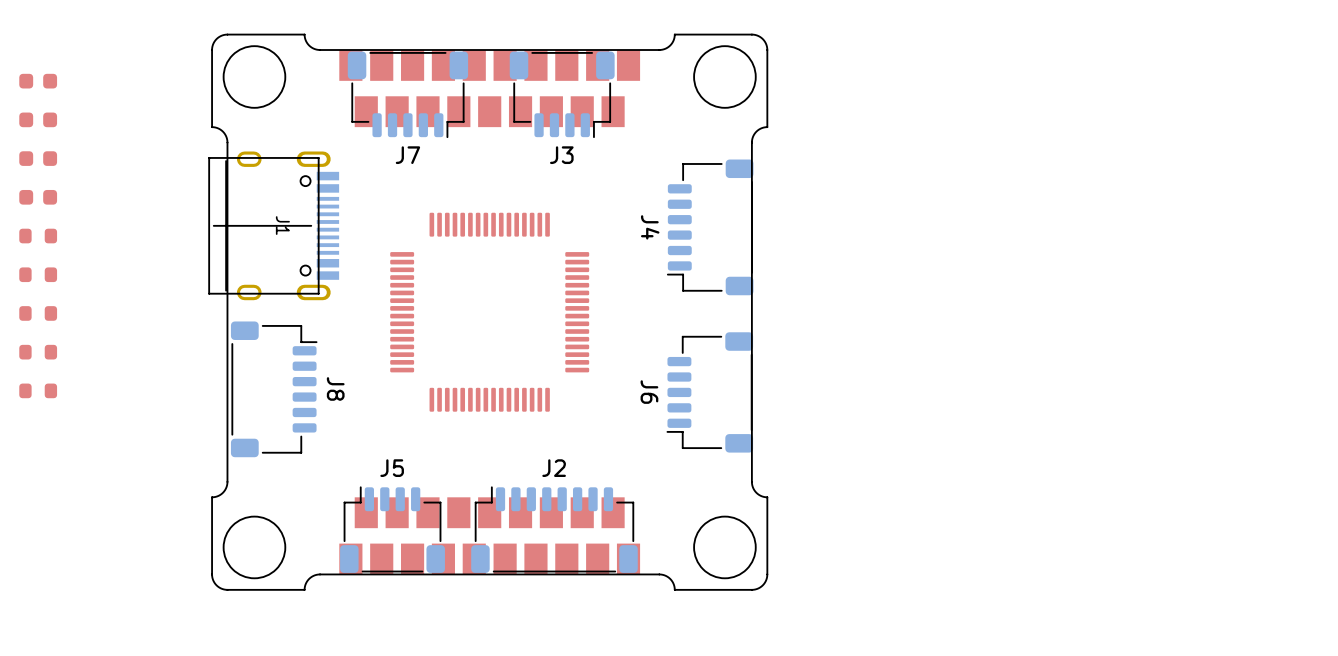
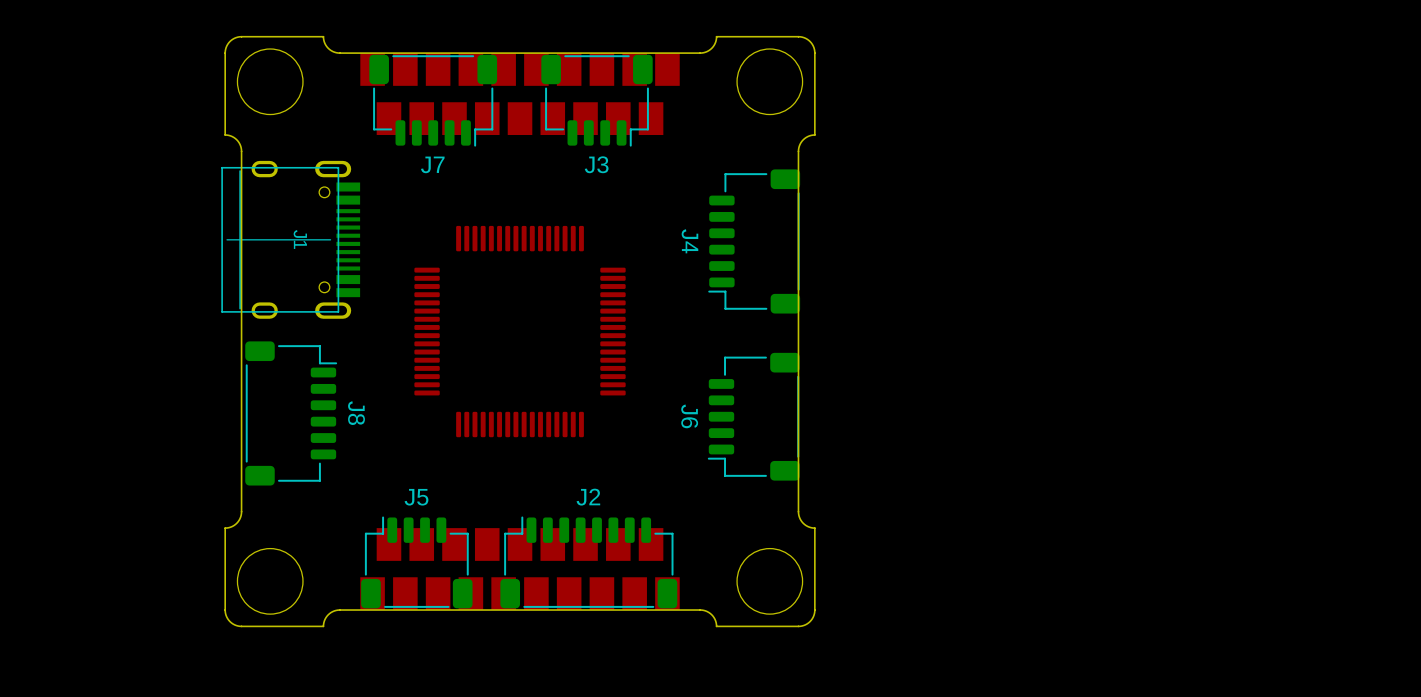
part: (38, 81) -> none
part: (38, 119) -> none
part: (38, 158) -> none
part: (38, 197) -> none
part: (38, 236) -> none
part: (38, 274) -> none
part: (38, 313) -> none
part: (38, 352) -> none
part: (38, 390) -> none

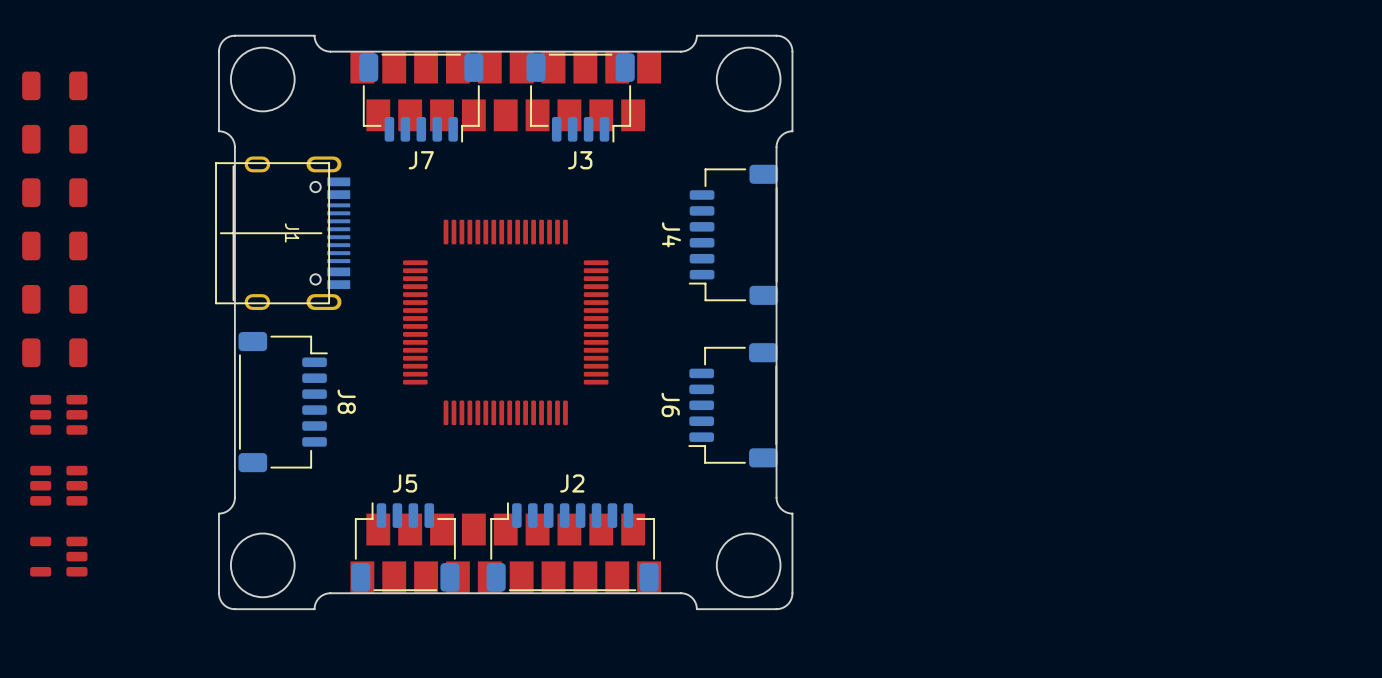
part: none -> (54, 85)
part: none -> (54, 139)
part: none -> (54, 192)
part: none -> (54, 245)
part: none -> (54, 299)
part: none -> (54, 352)
part: none -> (58, 414)
part: none -> (58, 485)
part: none -> (58, 556)

